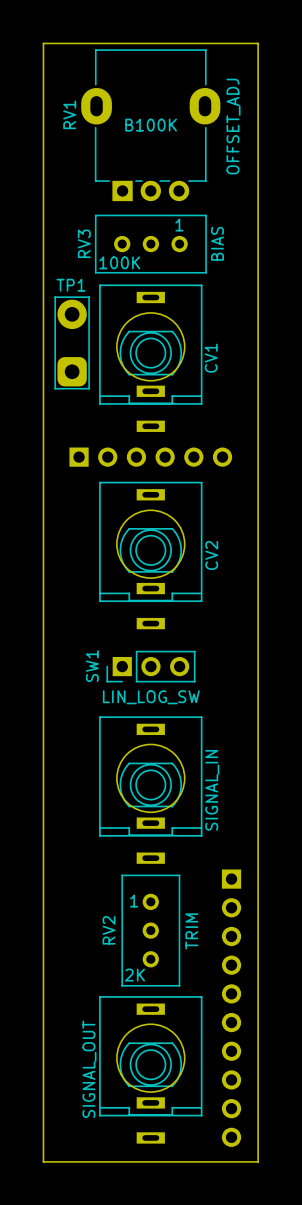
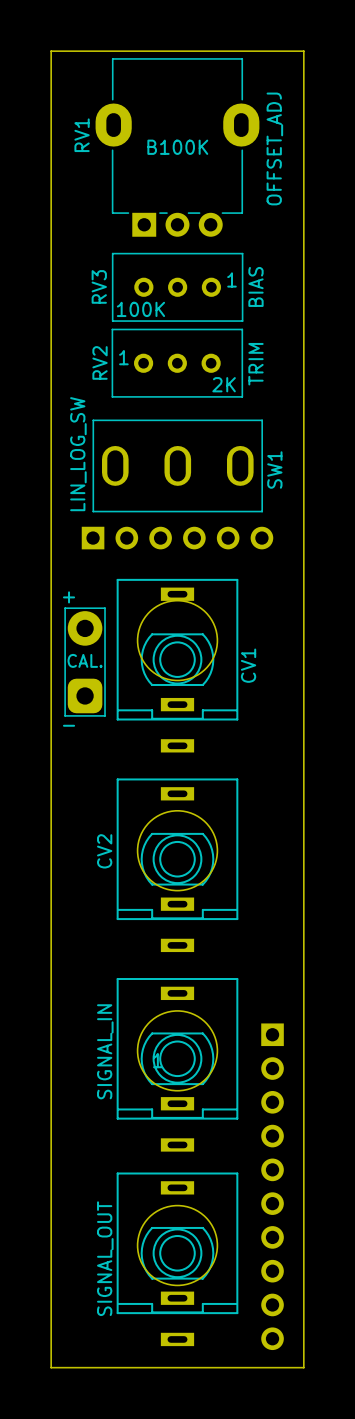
text position: 1 (179, 224) -> 1 (231, 279)
text: none -> 1 (123, 357)
round board edge: [116, 312, 185, 382] -> none
TP1: (72, 342) -> none
CV1 position: (150, 358) -> (177, 665)
text: none -> + (69, 597)
CV2 position: (150, 555) -> (177, 865)
CV2 name position: CV2 (211, 555) -> CV2 (104, 851)
CAL.: none -> (85, 662)
text: none -> - (69, 725)
SW1 footprint: [106, 650, 196, 683] -> [92, 419, 263, 513]
SW1 name position: SW1 (92, 666) -> SW1 (274, 470)
SW1 value position: LIN_LOG_SW (151, 697) -> LIN_LOG_SW (78, 454)
round board edge position: (150, 778) -> (177, 850)
SIGNAL_IN position: (150, 790) -> (177, 1064)
SIGNAL_IN name position: SIGNAL_IN (212, 790) -> SIGNAL_IN (105, 1051)
round board edge: none -> [137, 1010, 218, 1092]
RV2 footprint: [121, 874, 181, 987] -> [111, 328, 244, 398]
RV2 name position: RV2 (109, 930) -> RV2 (100, 362)
RV2 value position: TRIM (191, 931) -> TRIM (255, 364)

